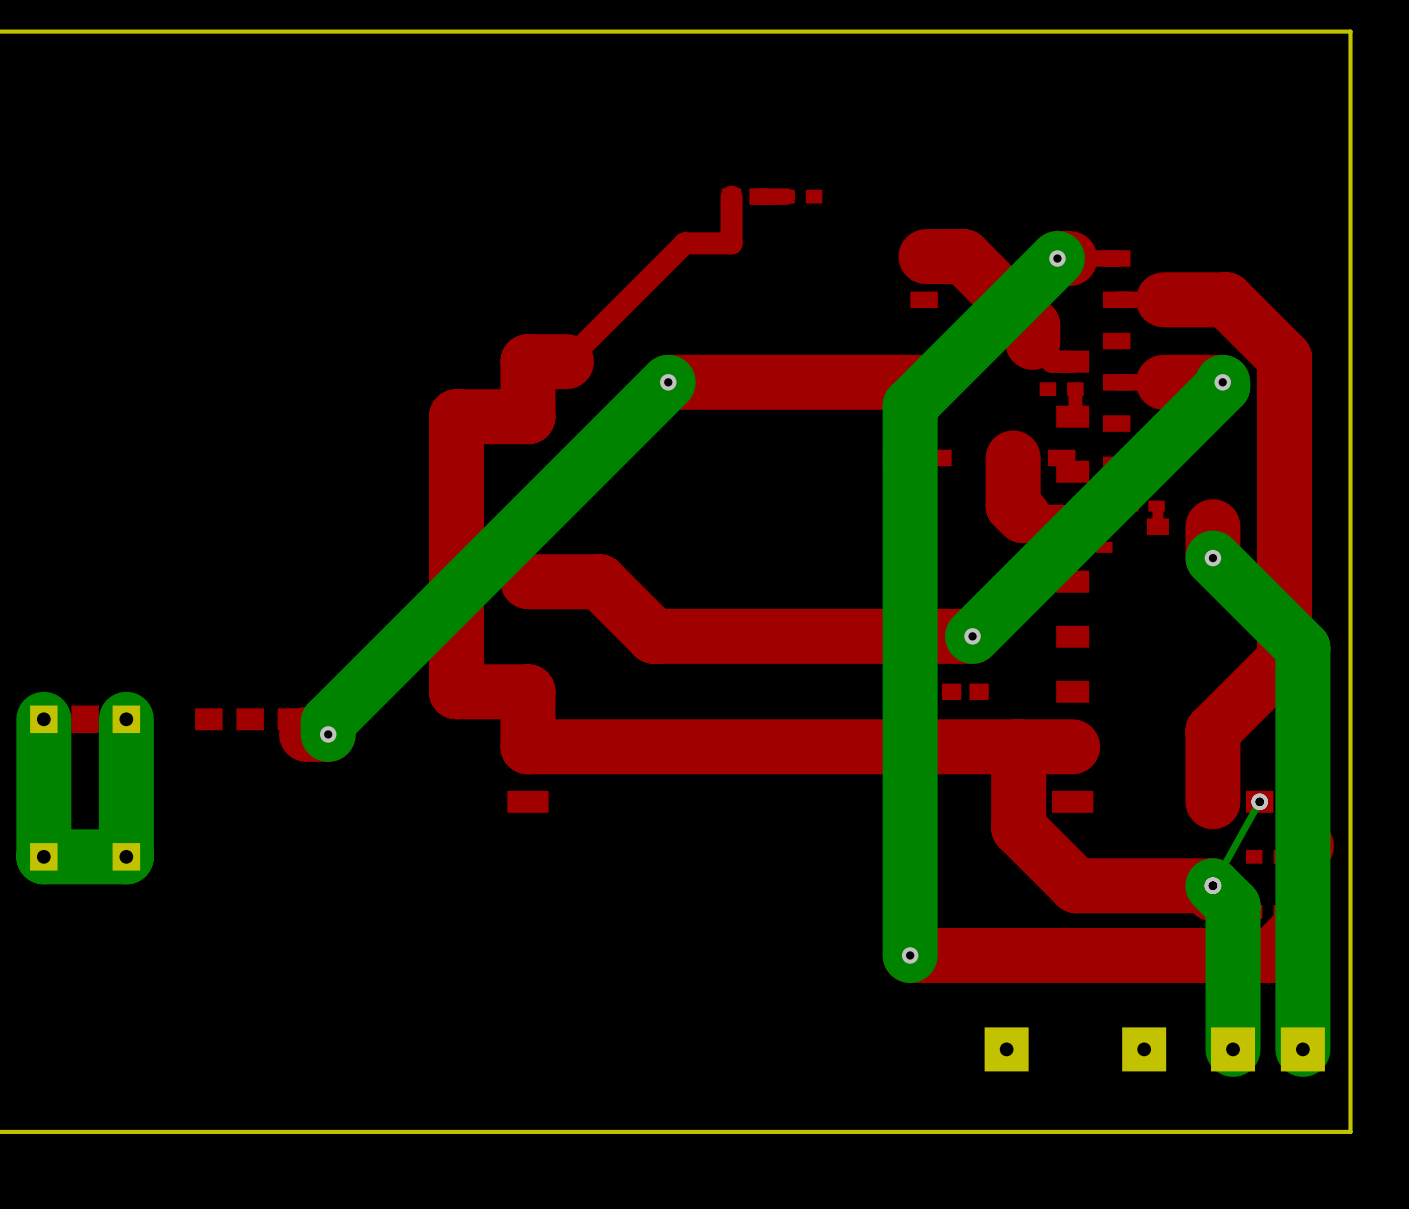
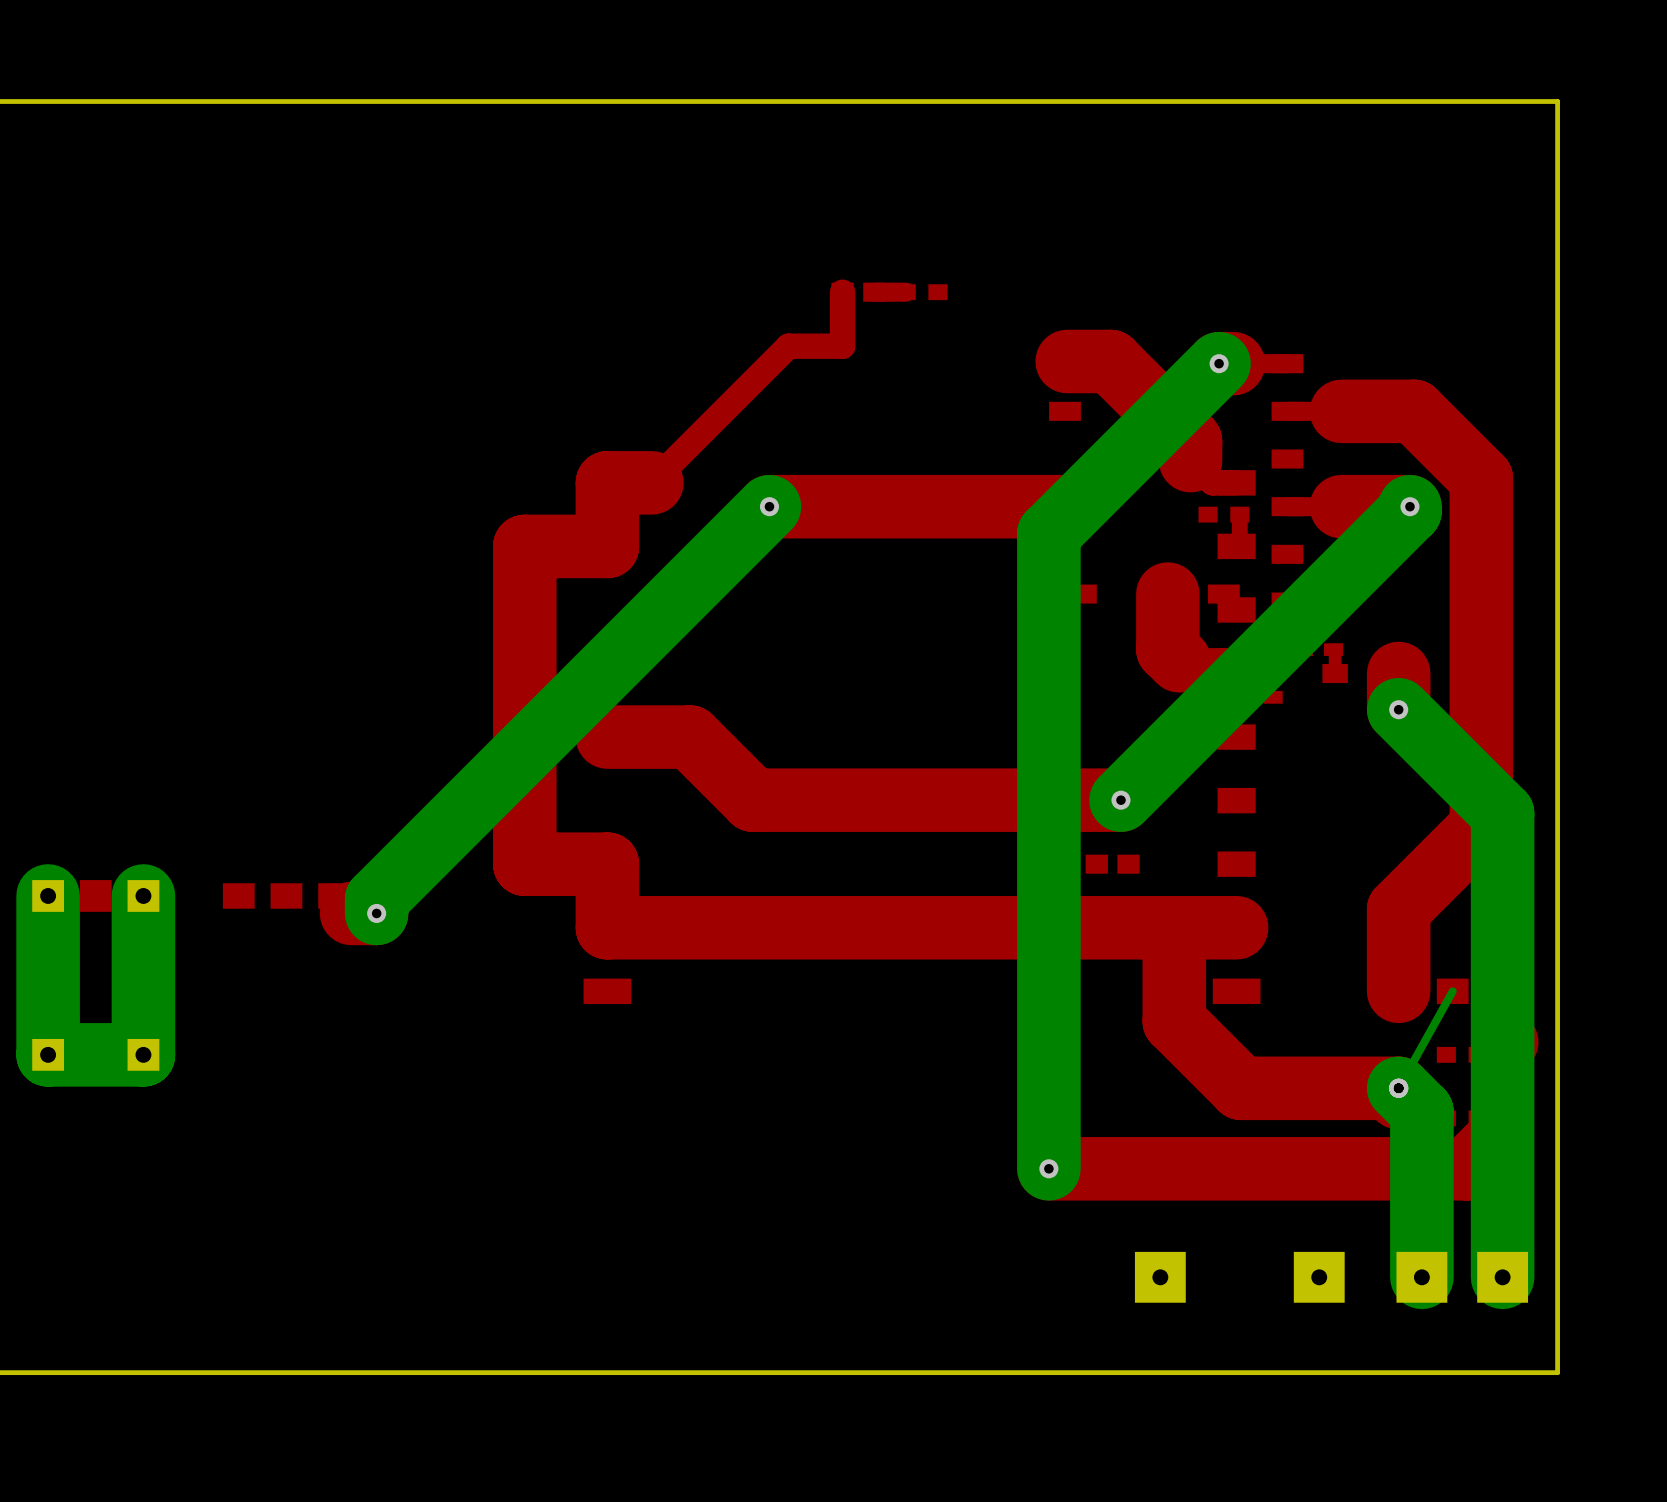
via: (1259, 801) -> none

